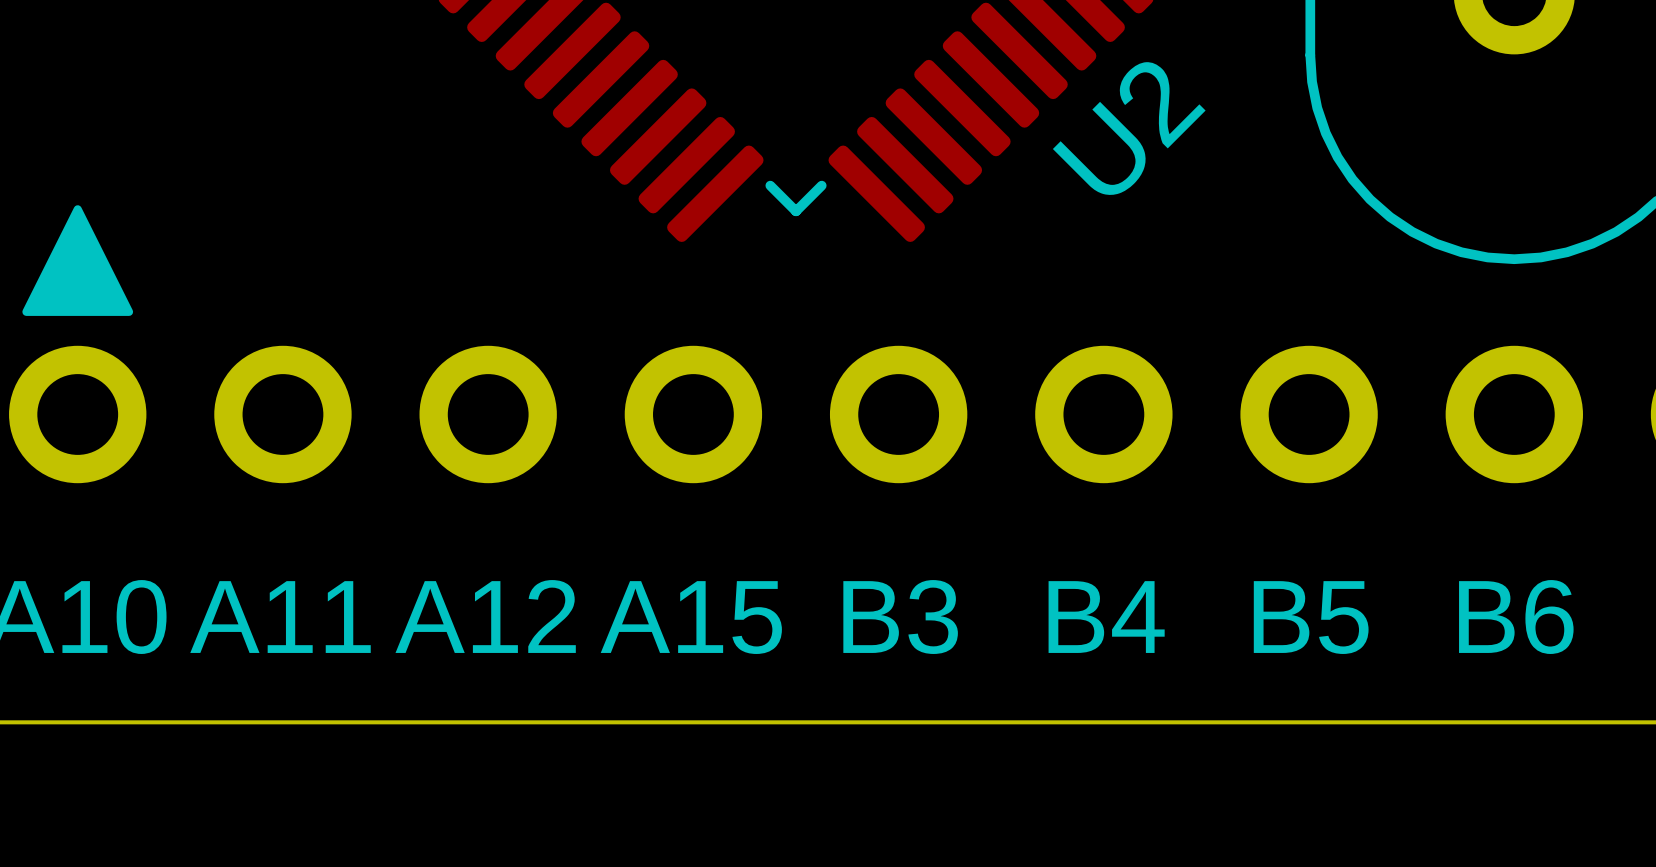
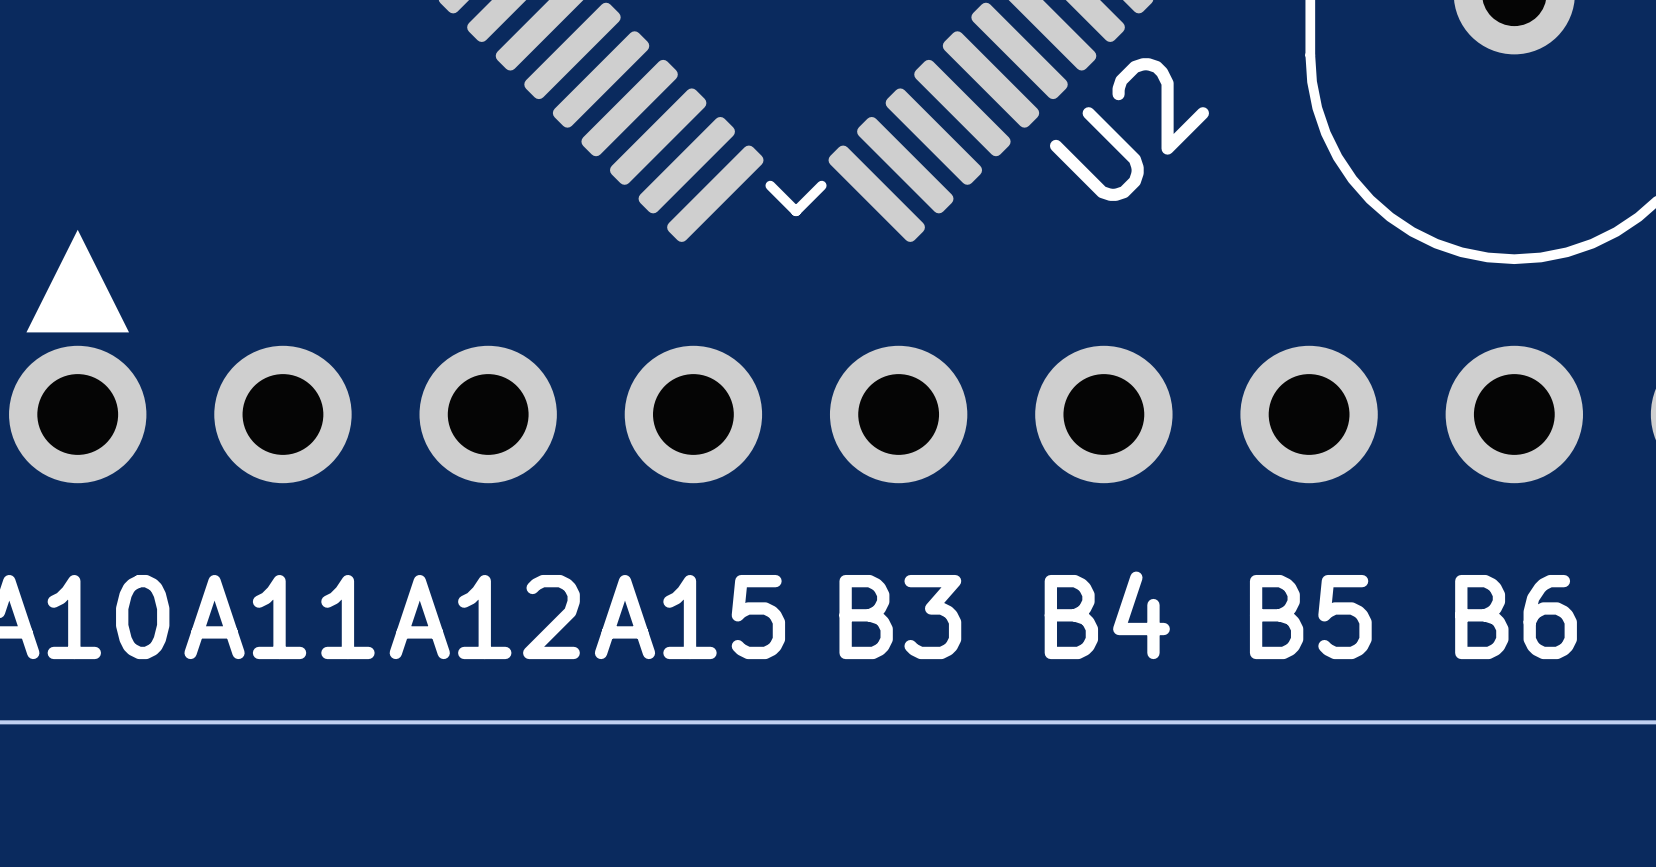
drawing shape: [22, 205, 134, 316] -> [26, 229, 130, 333]

